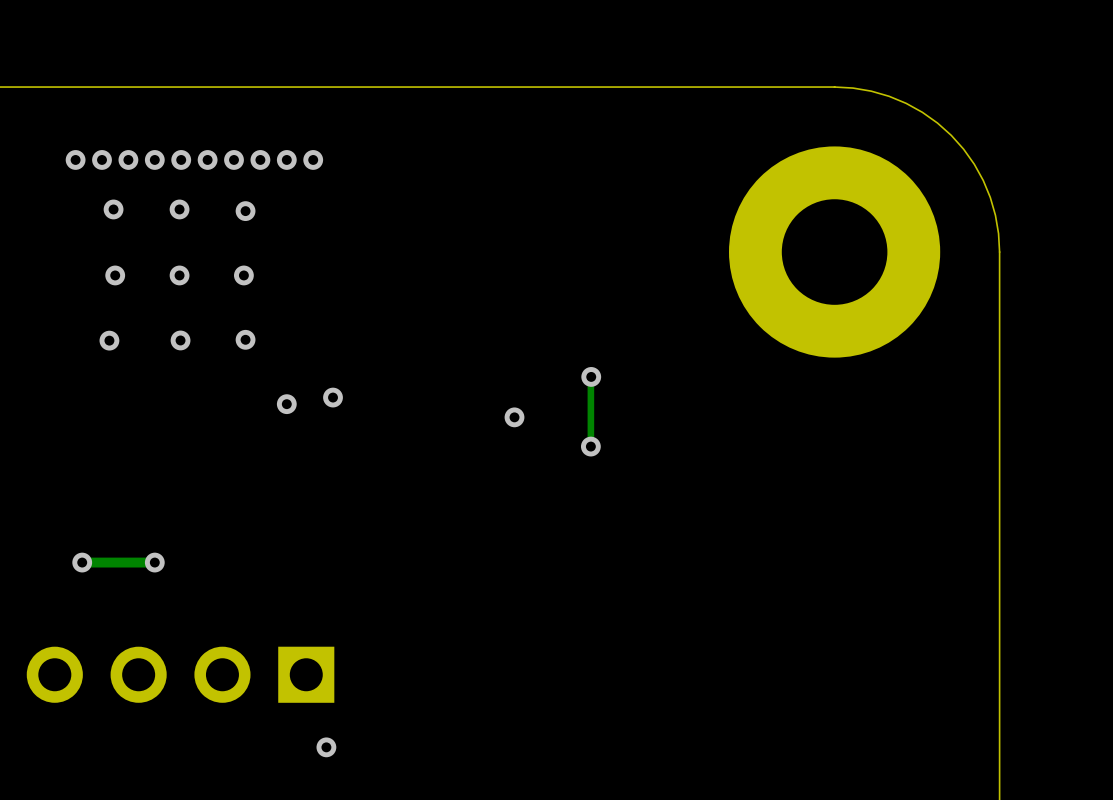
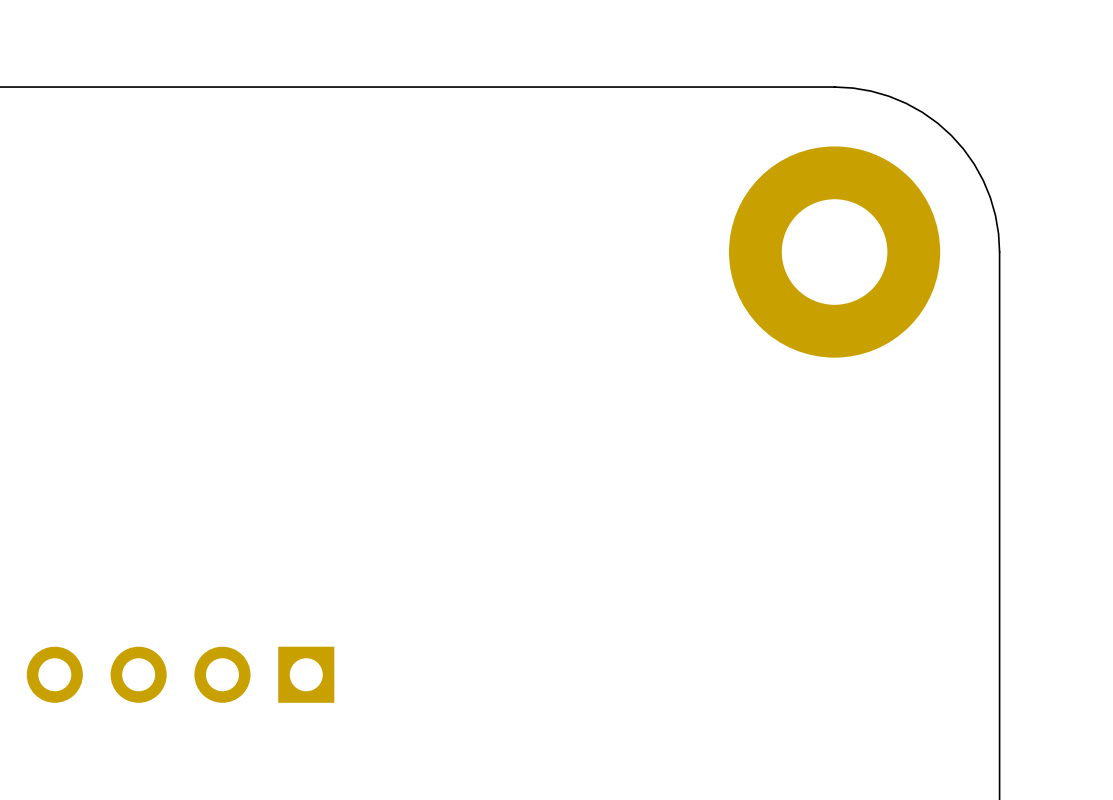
via: (75, 159) -> none
via: (102, 159) -> none
via: (128, 159) -> none
via: (154, 159) -> none
via: (181, 159) -> none
via: (207, 159) -> none
via: (234, 159) -> none
via: (260, 159) -> none
via: (286, 159) -> none
via: (313, 159) -> none
via: (113, 209) -> none
via: (179, 209) -> none
via: (245, 211) -> none
via: (115, 275) -> none
via: (179, 275) -> none
via: (243, 275) -> none
via: (245, 339) -> none
via: (109, 340) -> none
via: (180, 340) -> none
via: (591, 376) -> none
track: (590, 377) (590, 446) -> none
via: (333, 397) -> none
via: (286, 404) -> none
via: (514, 417) -> none
via: (590, 446) -> none
via: (82, 562) -> none
track: (154, 562) (82, 562) -> none
via: (154, 562) -> none
via: (326, 747) -> none

